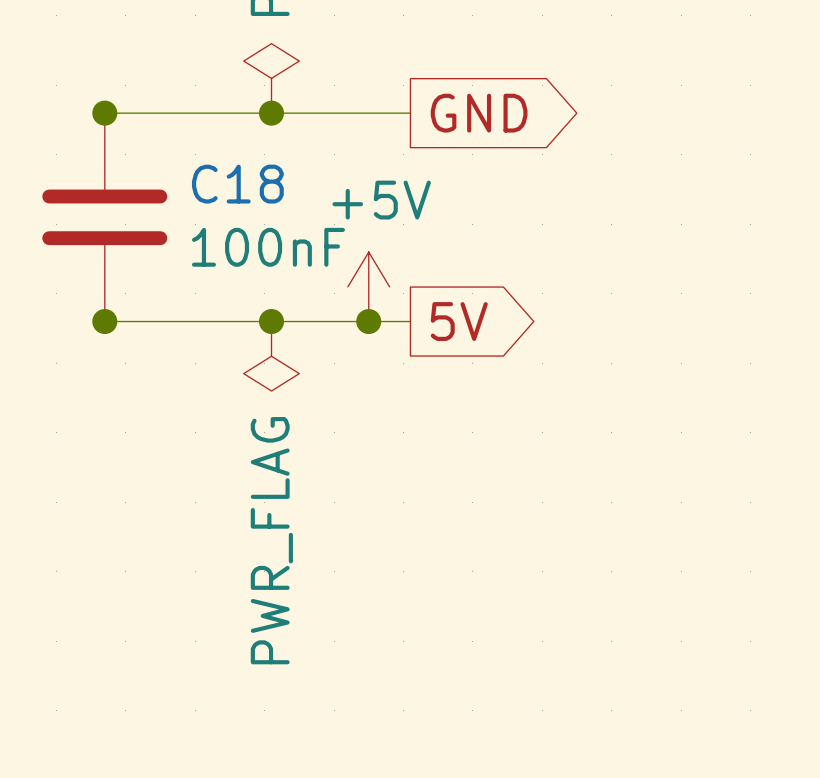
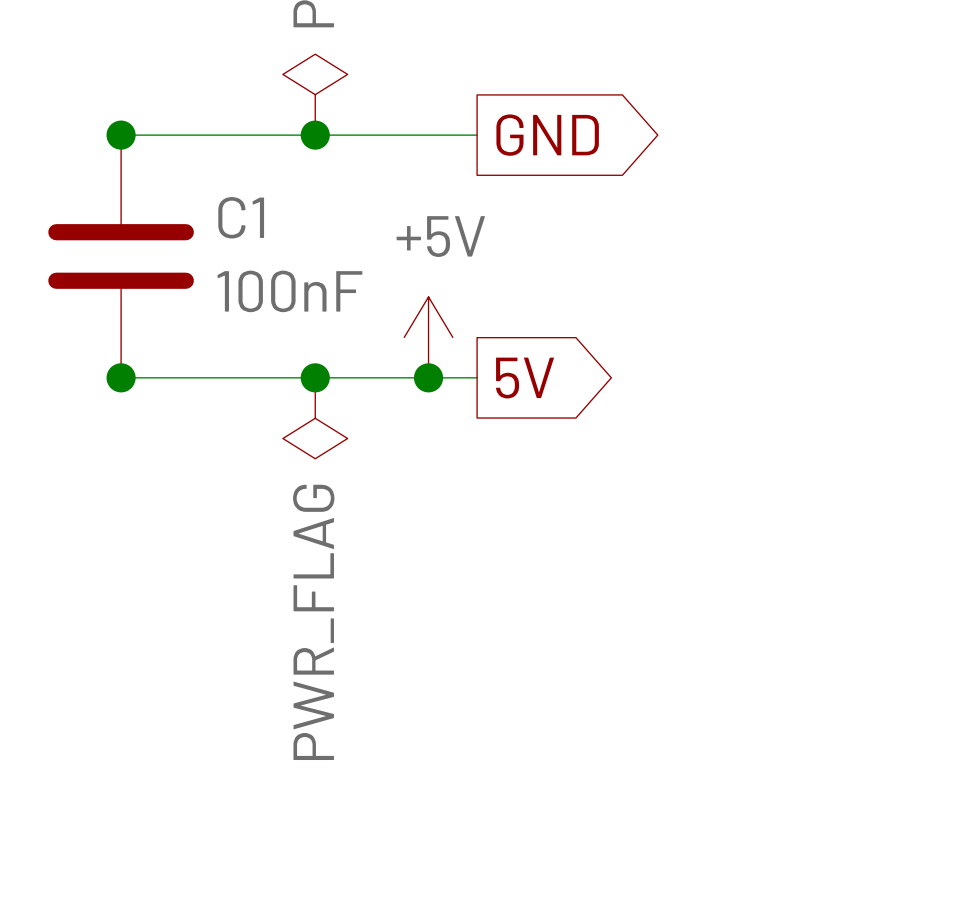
C18 name: C18 (237, 184) -> C1 (241, 217)

